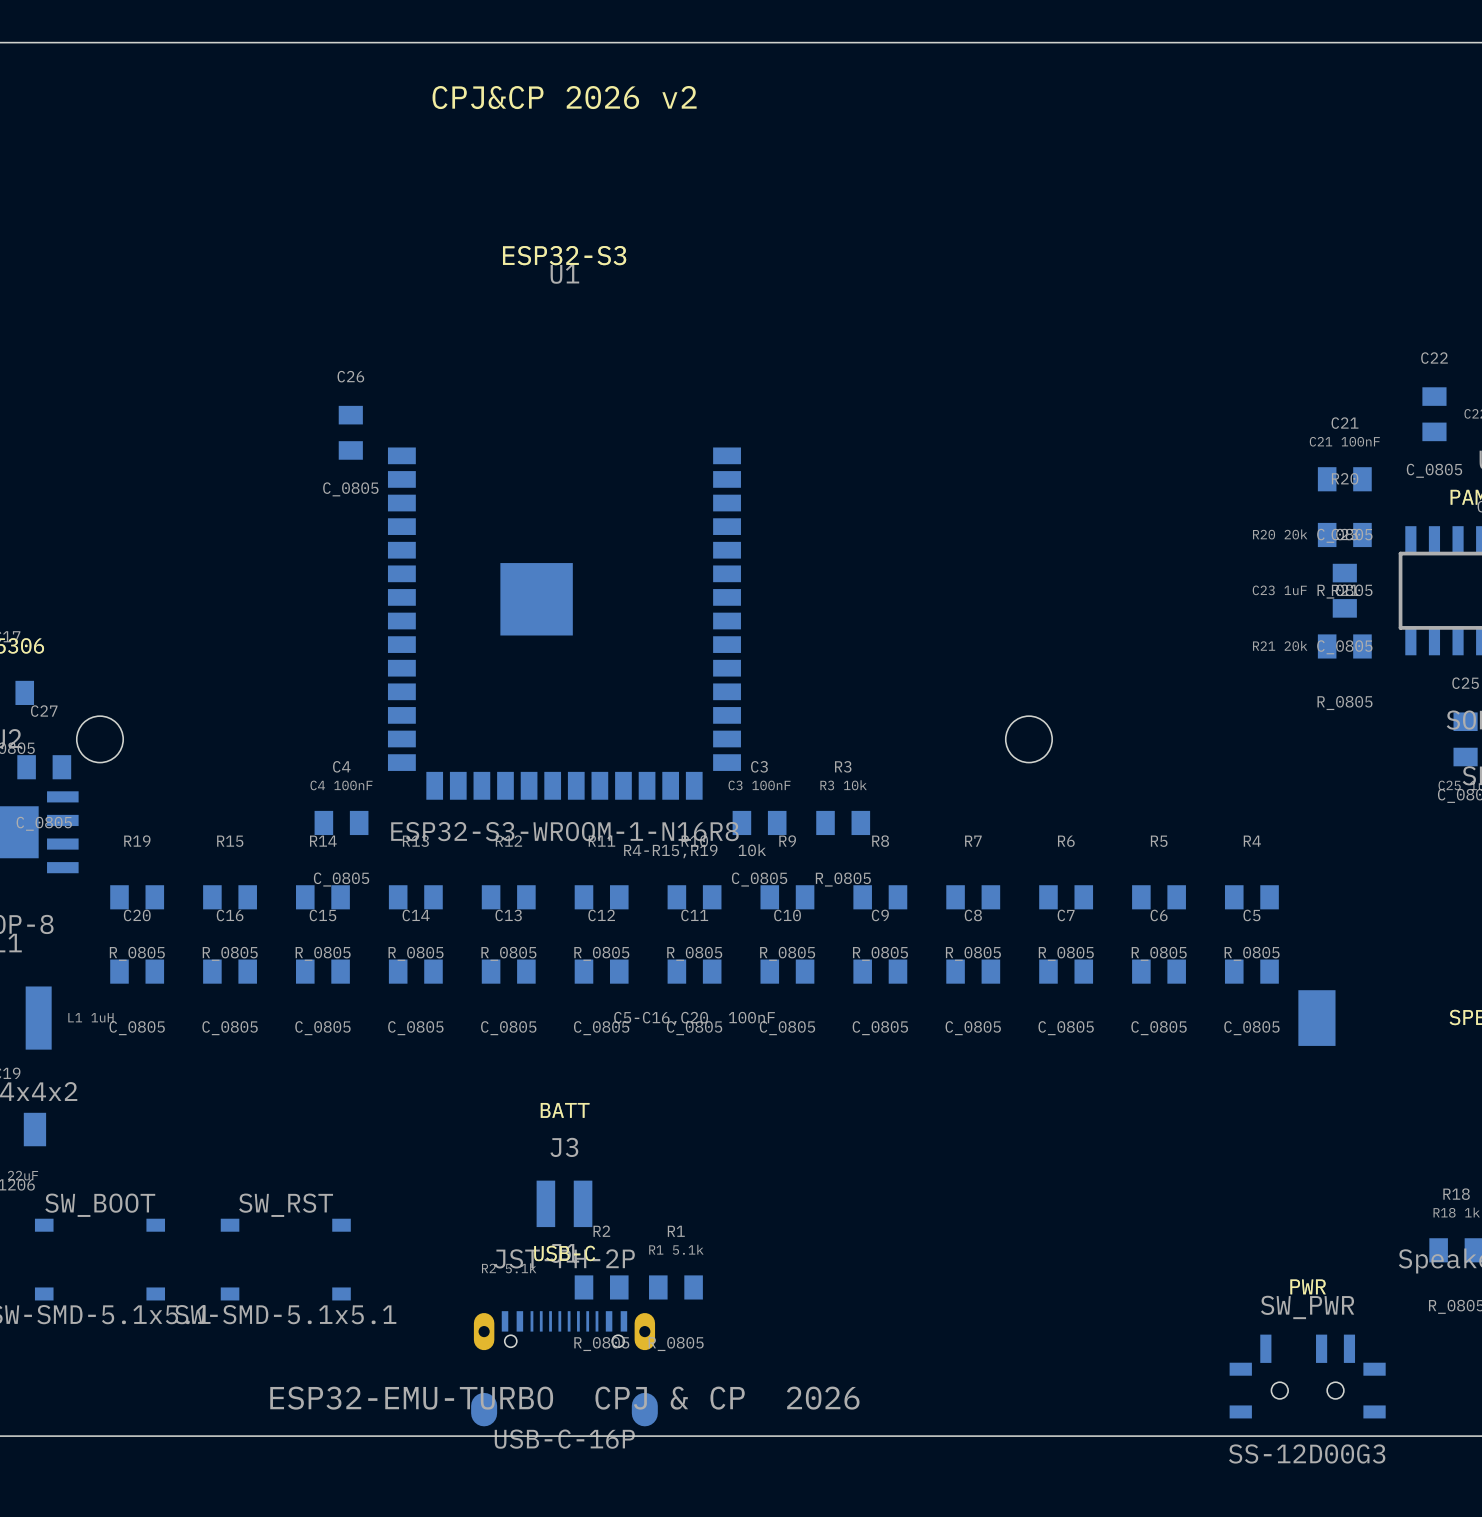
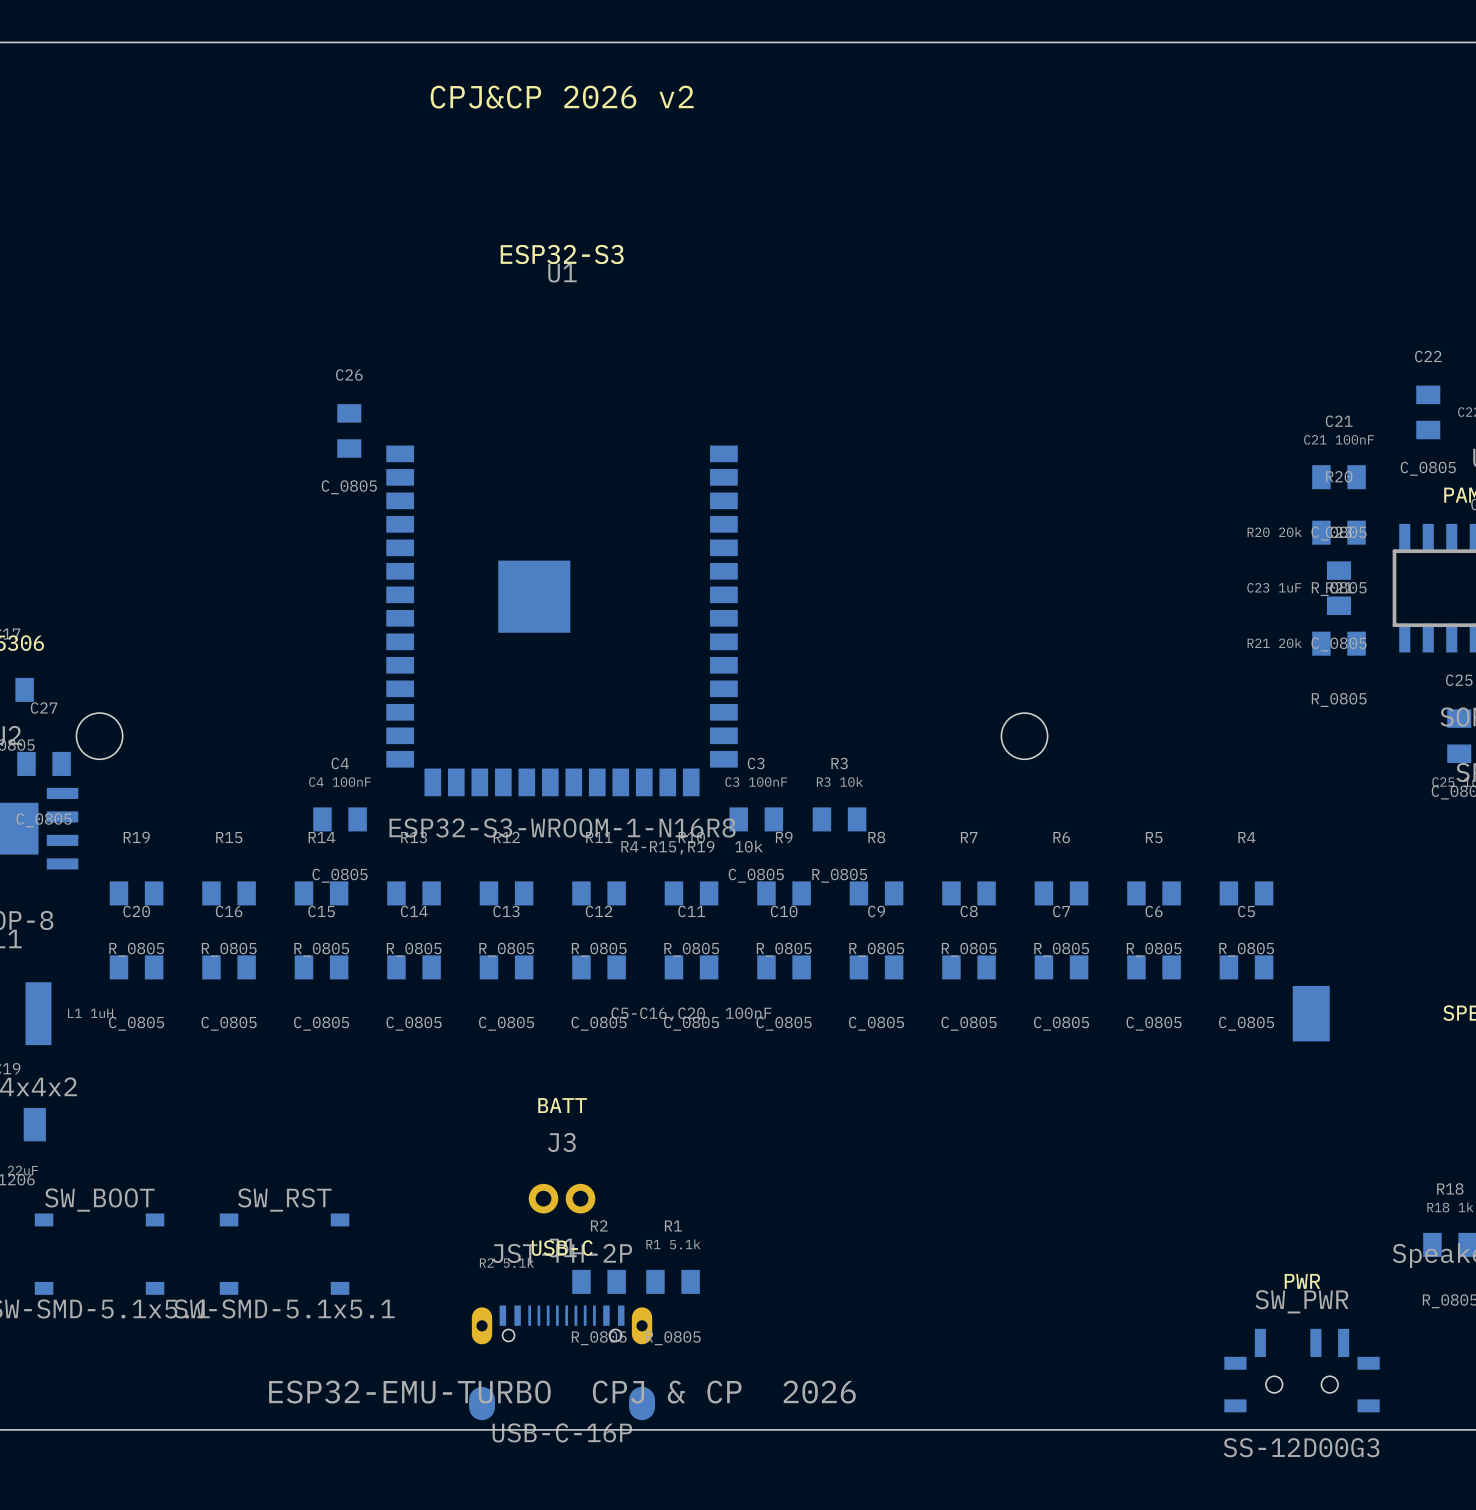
J3 footprint: [536, 1180, 593, 1228] -> [528, 1183, 596, 1214]

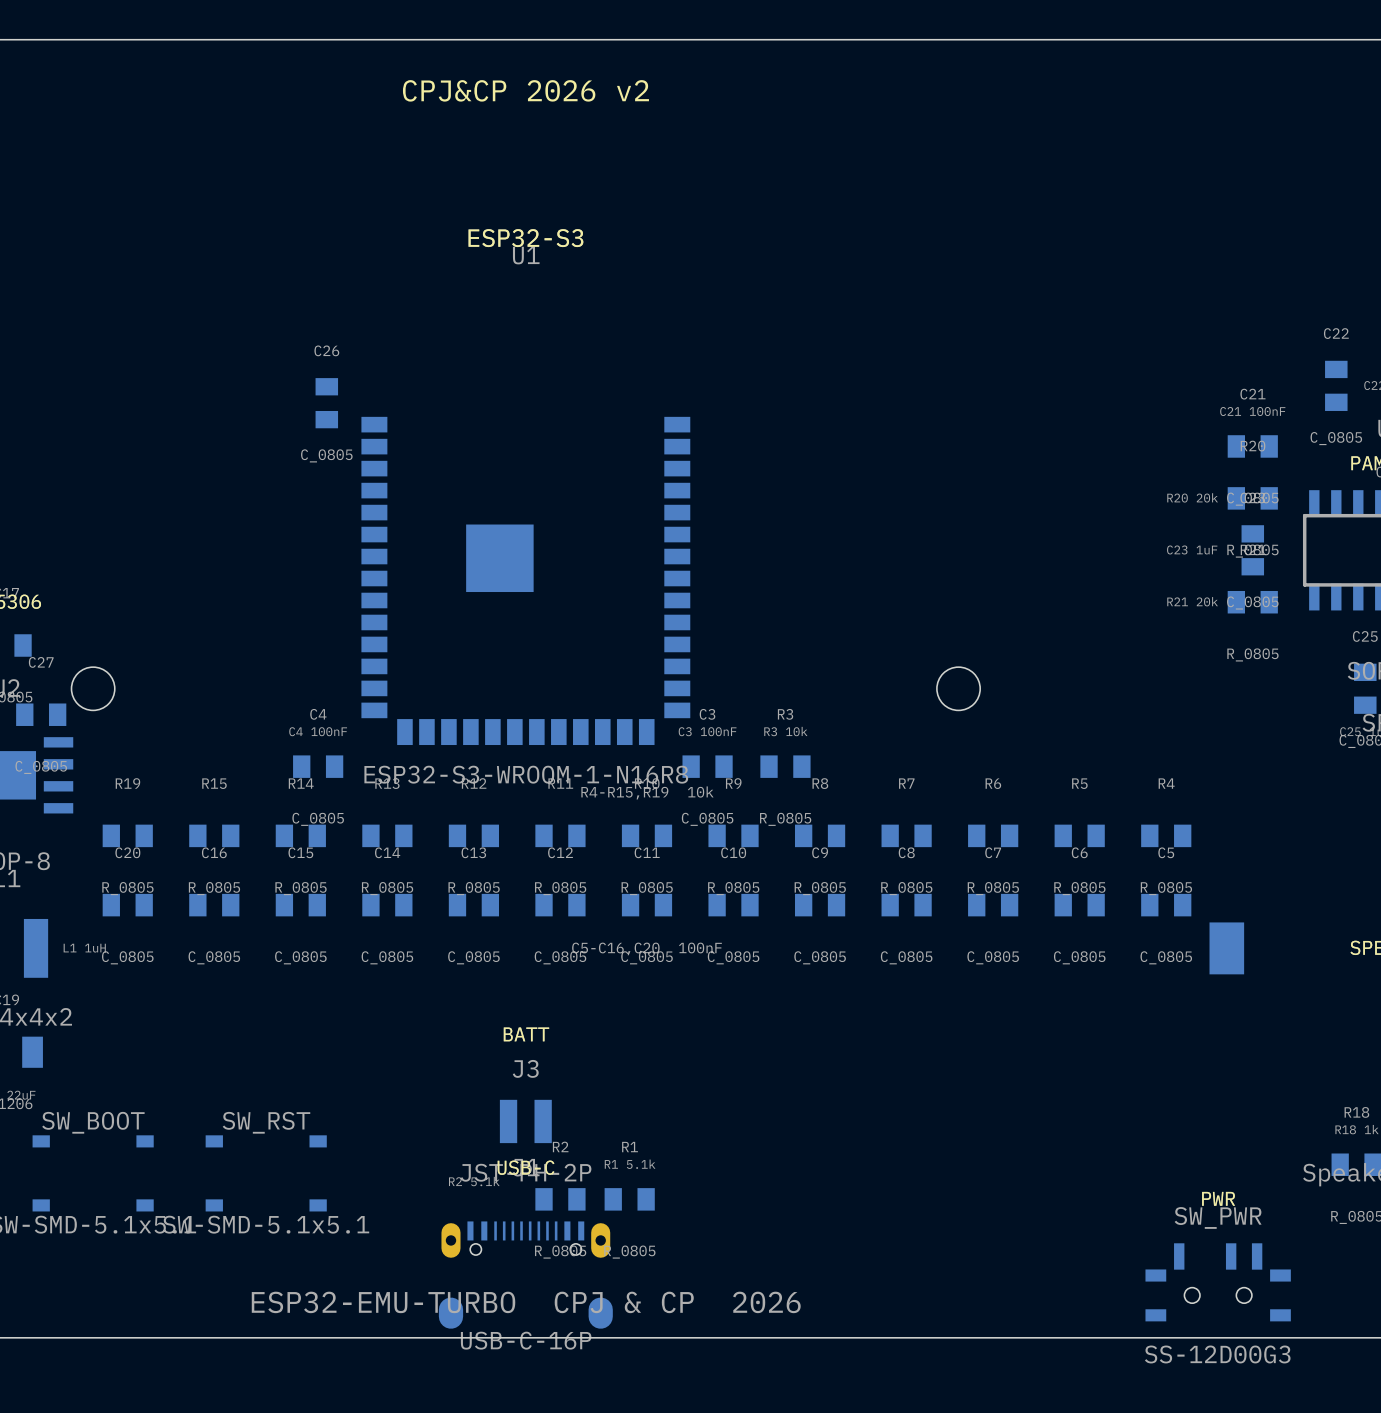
J3 footprint: [528, 1183, 596, 1214] -> [499, 1099, 552, 1144]

